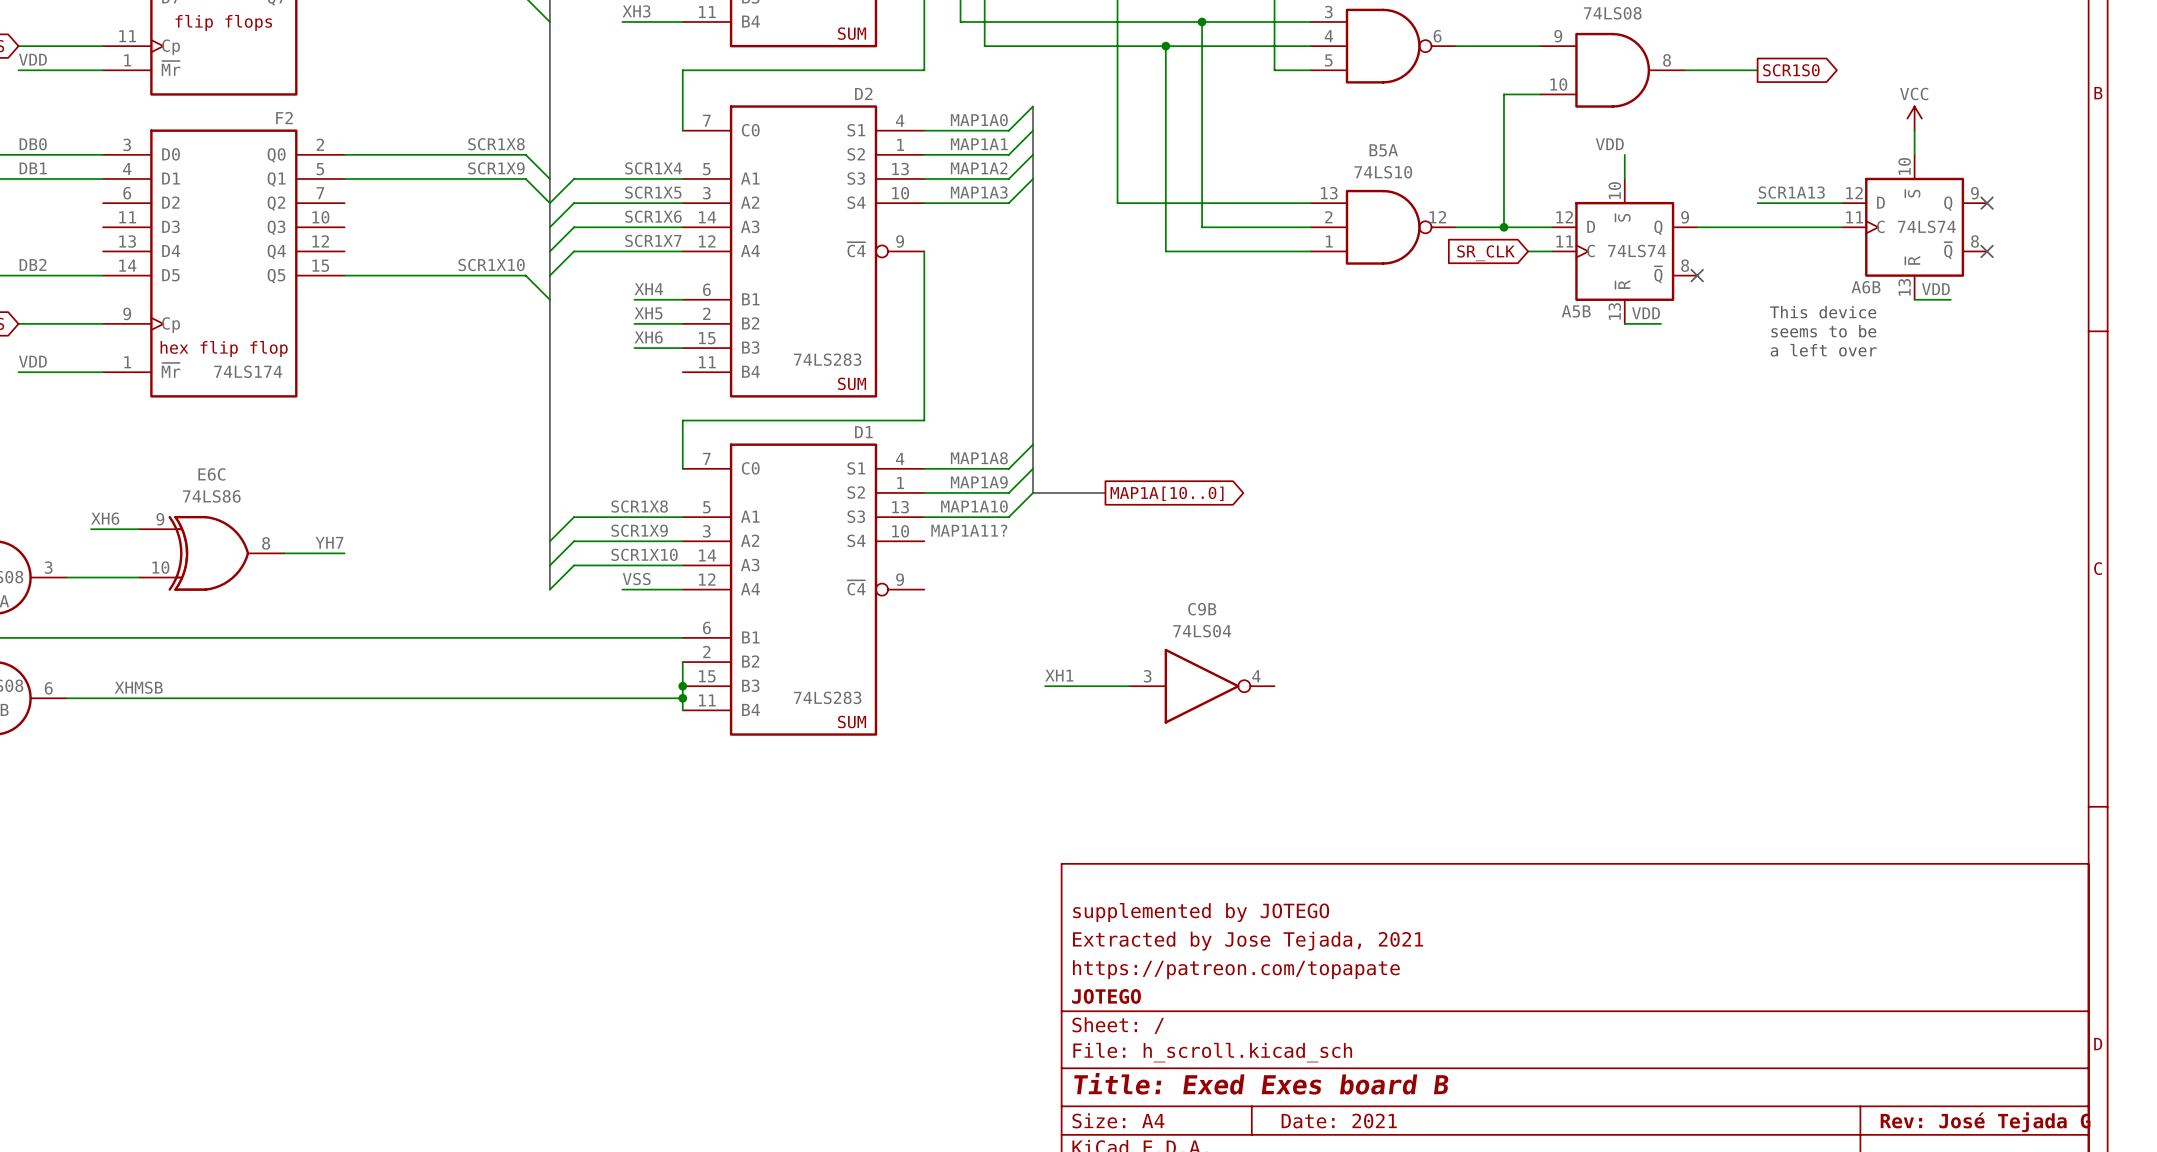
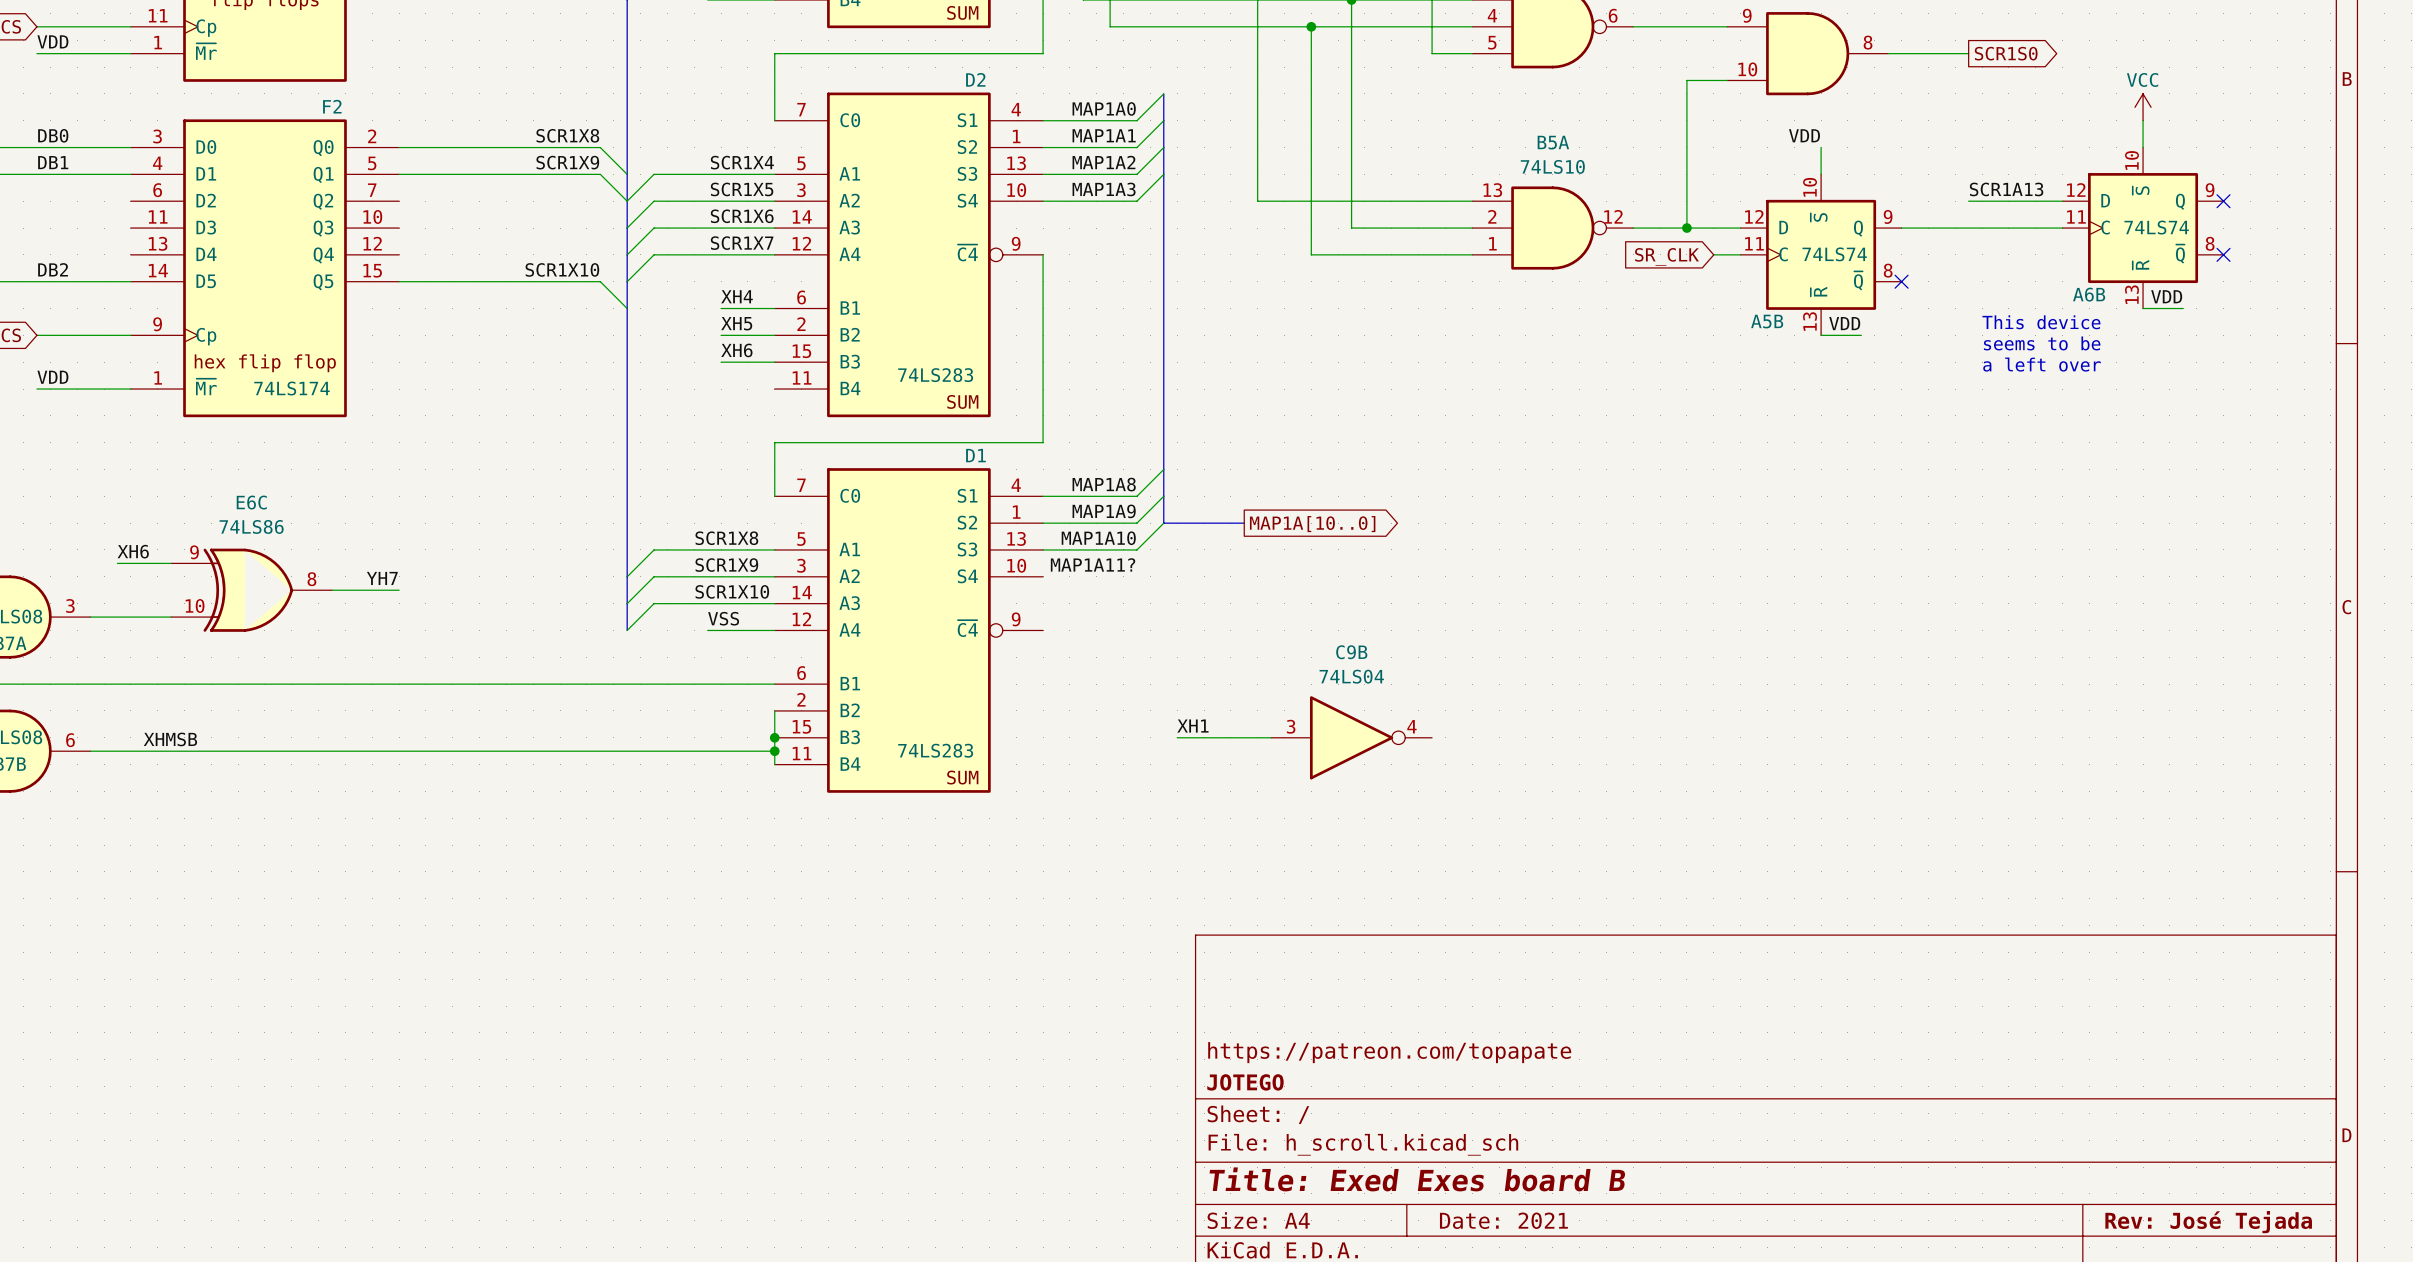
title block: supplemented by JOTEGO (1201, 912) -> none
title block: Extracted by Jose Tejada, 2021 (1248, 941) -> none
title block: Rev: José Tejada G (1985, 1122) -> Rev: José Tejada (2208, 1222)

